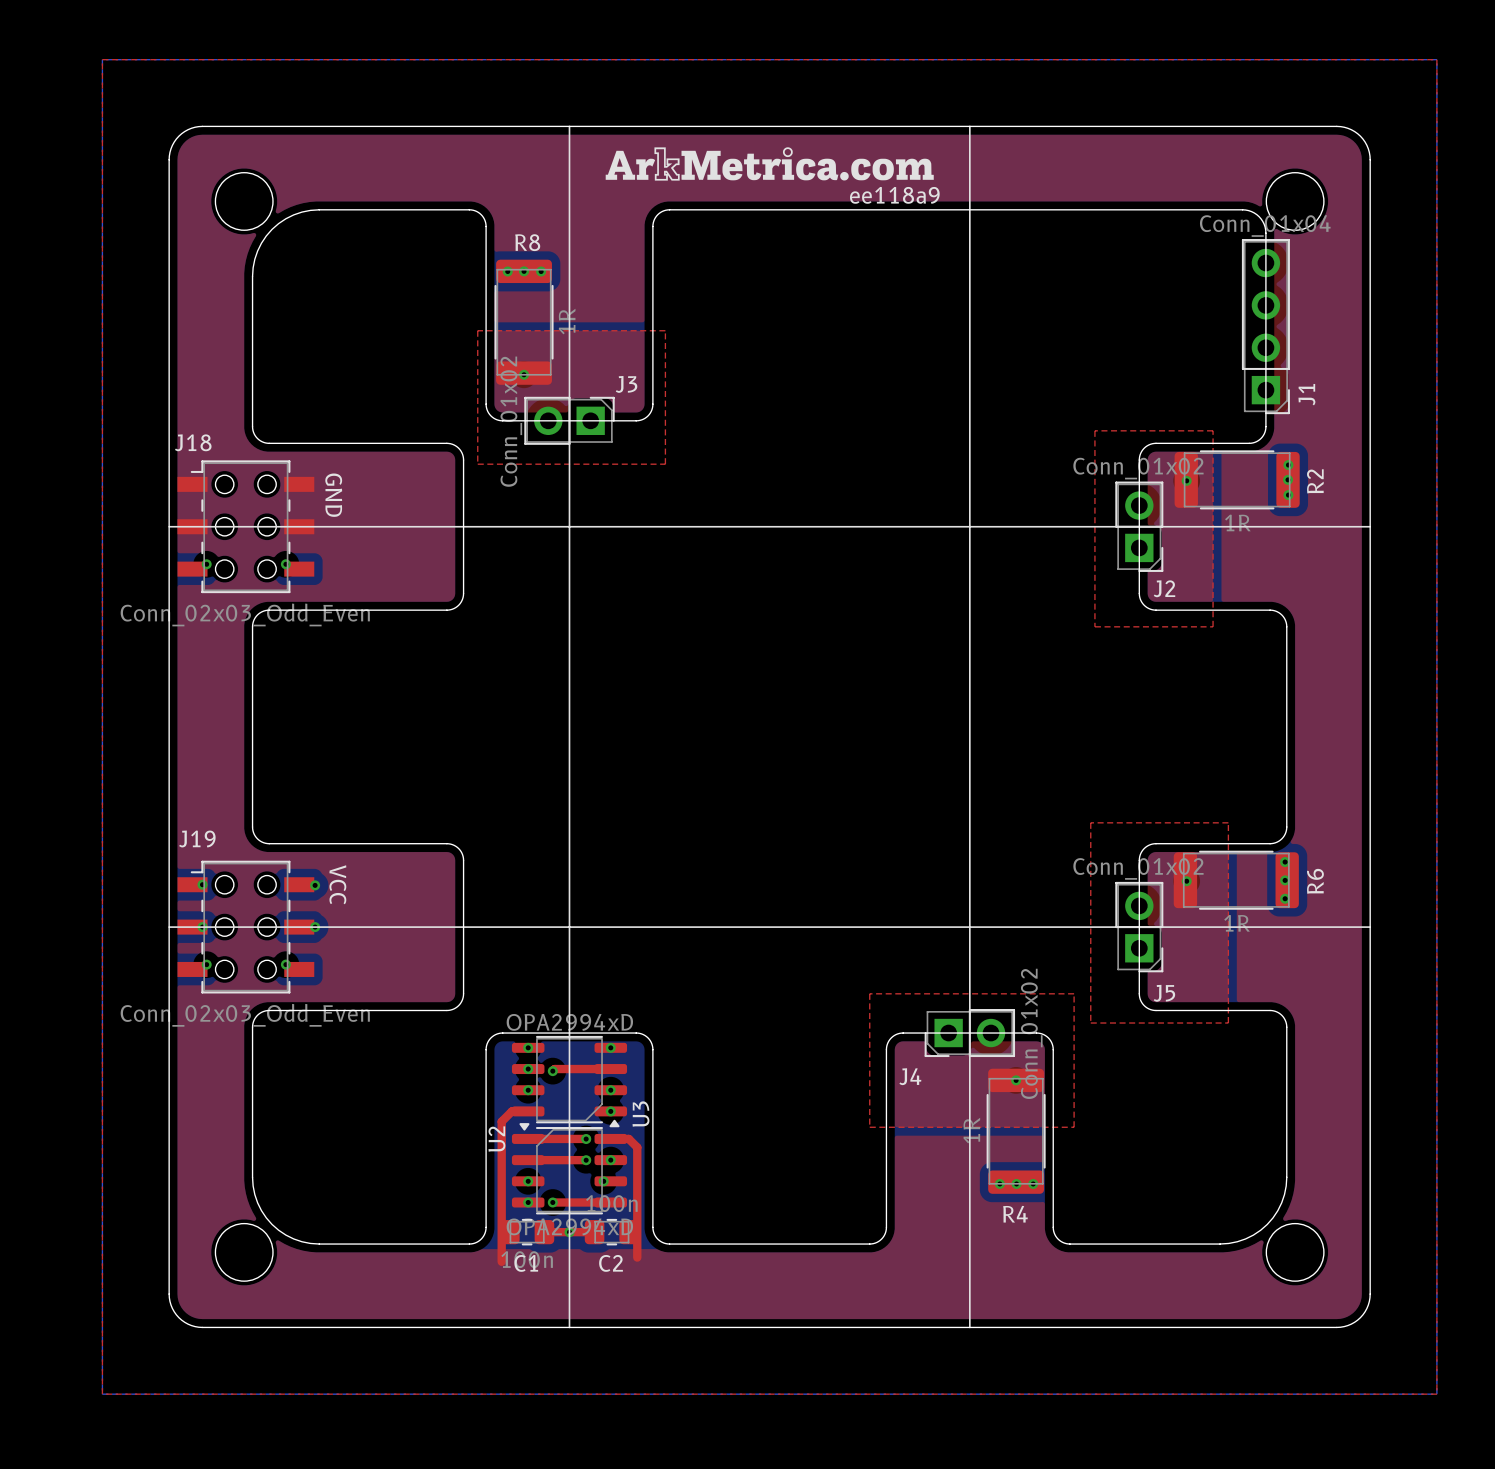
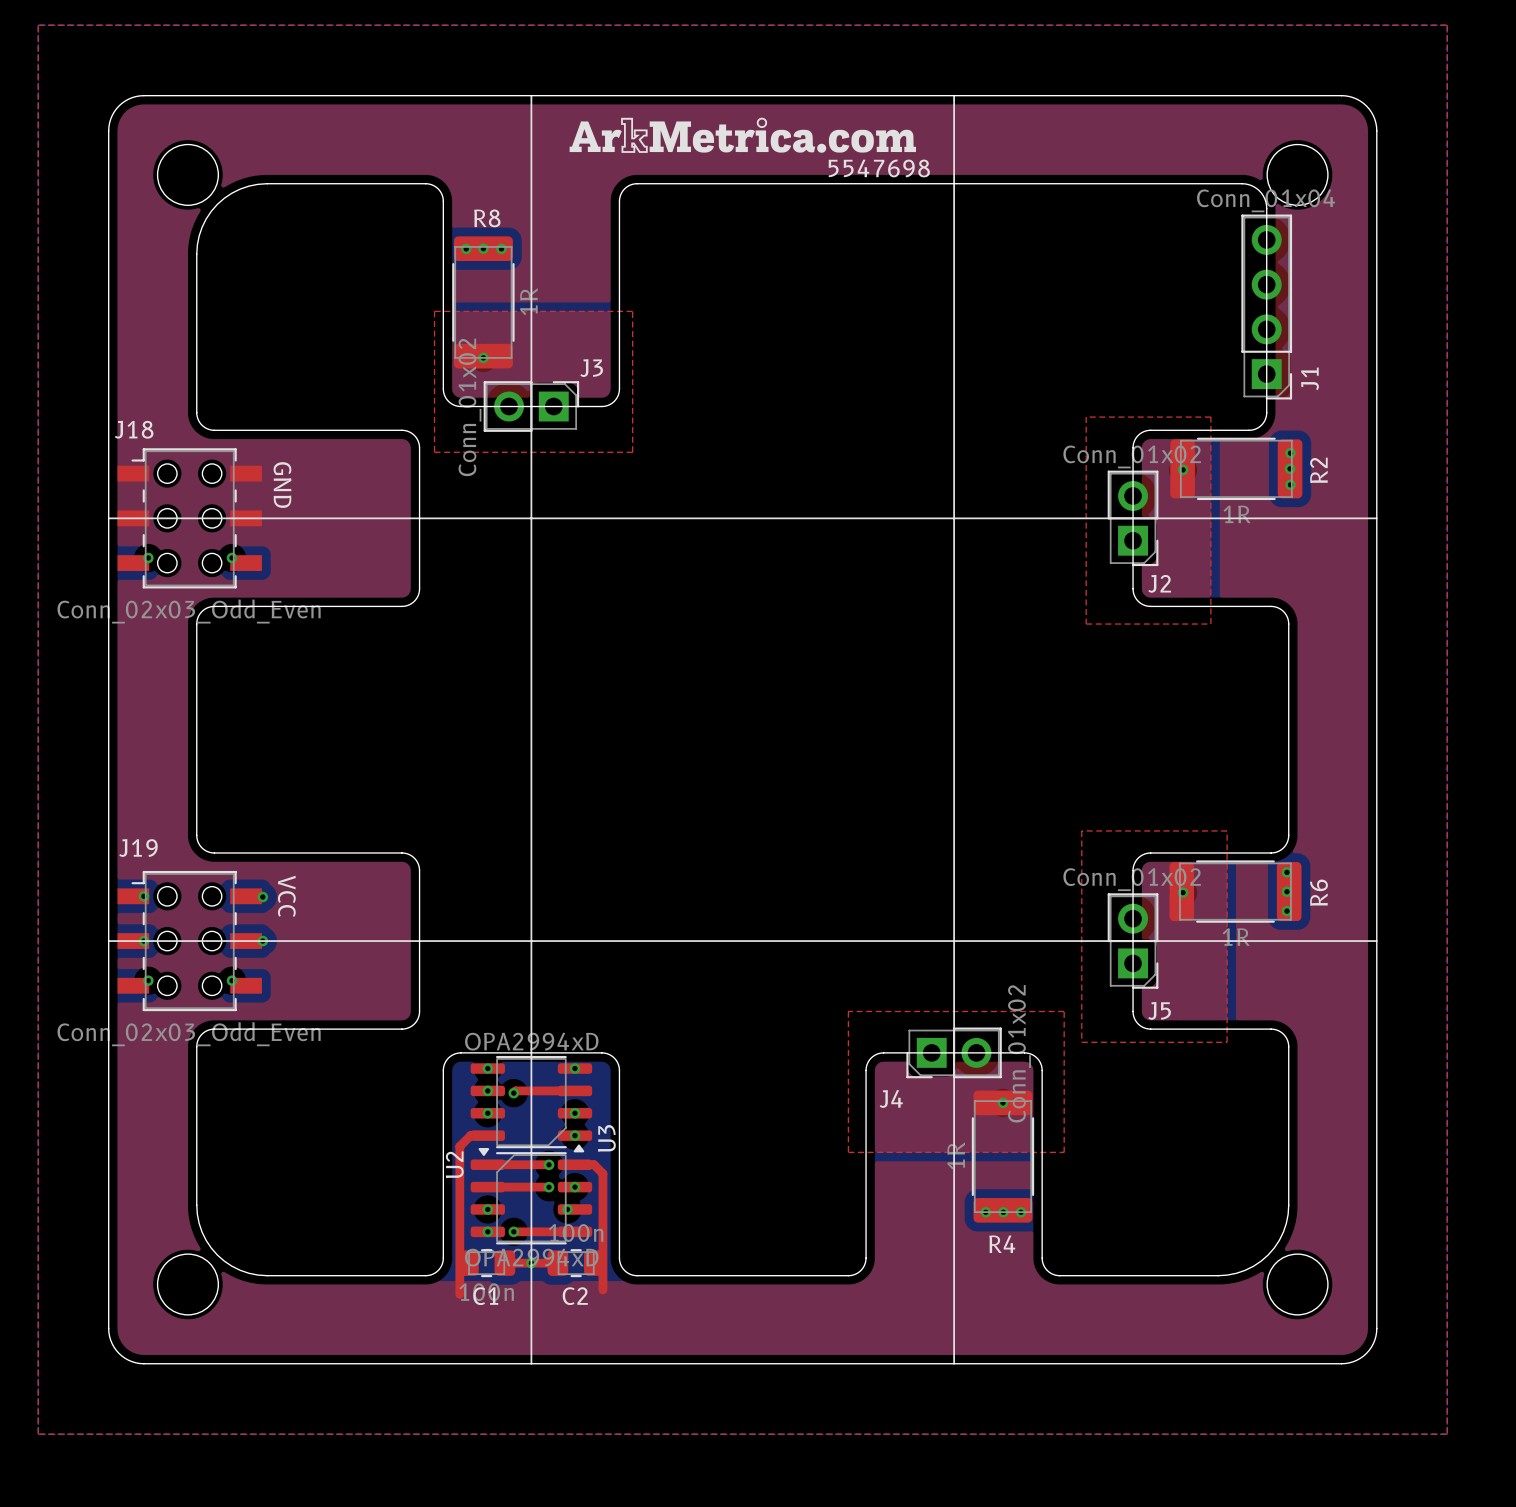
text: ee118a9 (894, 195) -> 5547698 (879, 168)

